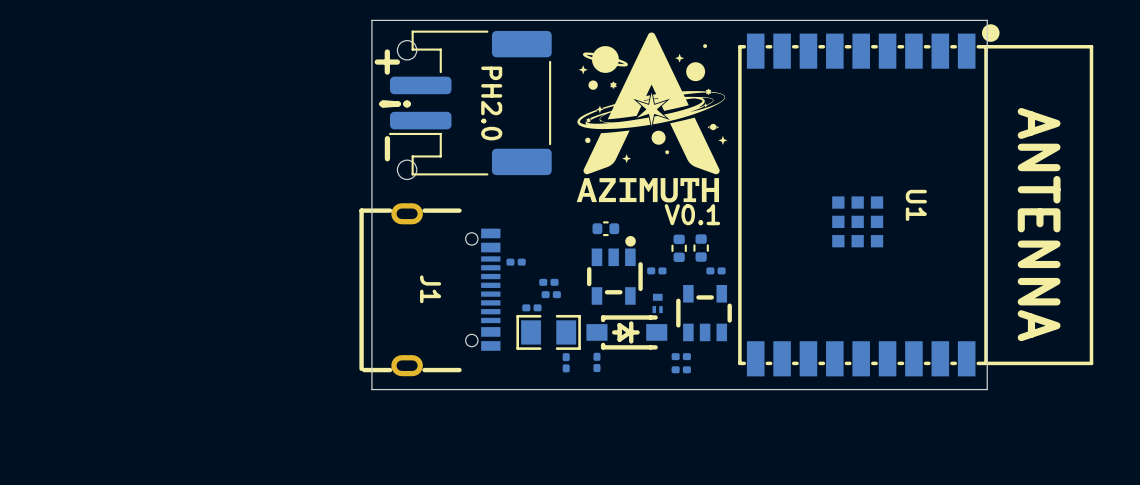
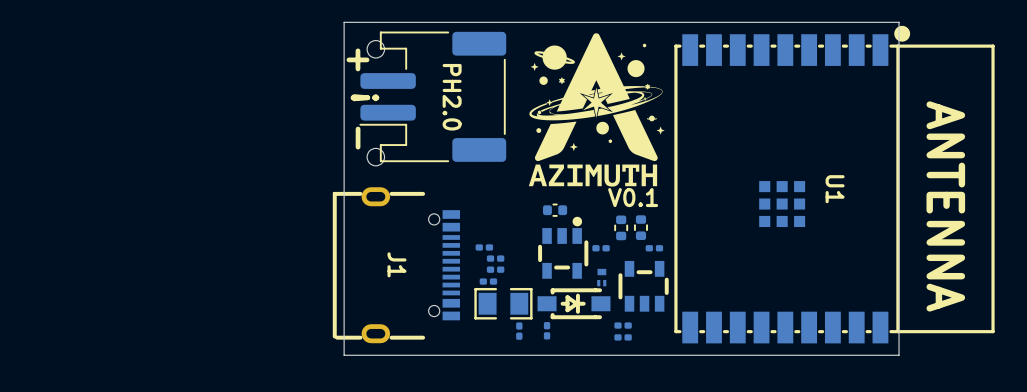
part: (516, 262) -> none
part: none -> (484, 247)
part: none -> (495, 258)
part: (548, 282) -> none
part: none -> (495, 269)
part: (551, 294) -> none

